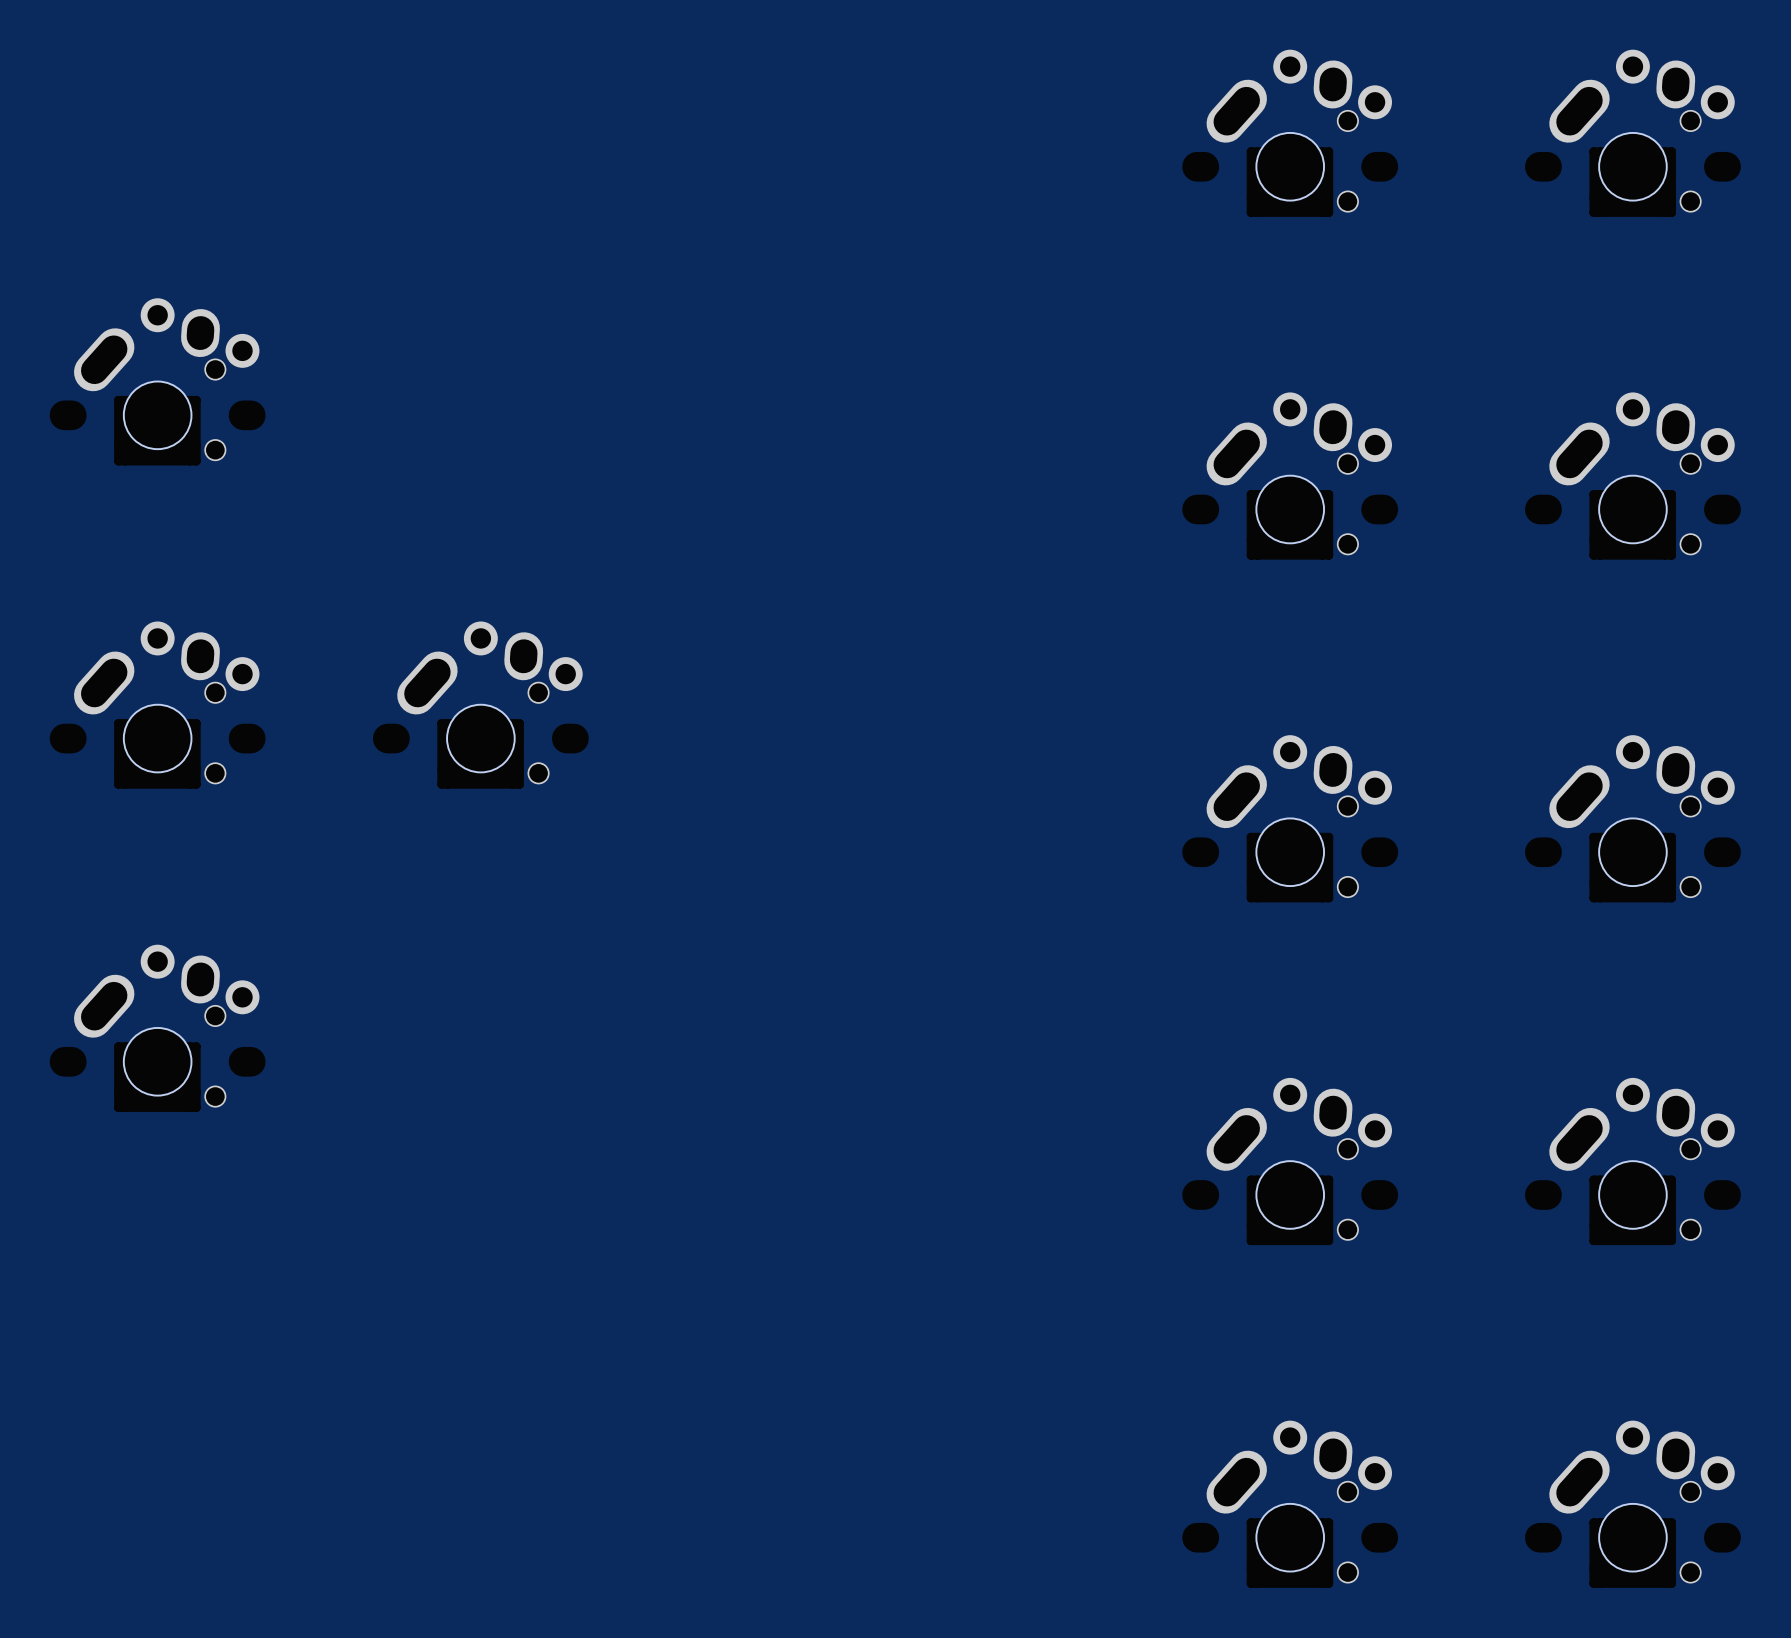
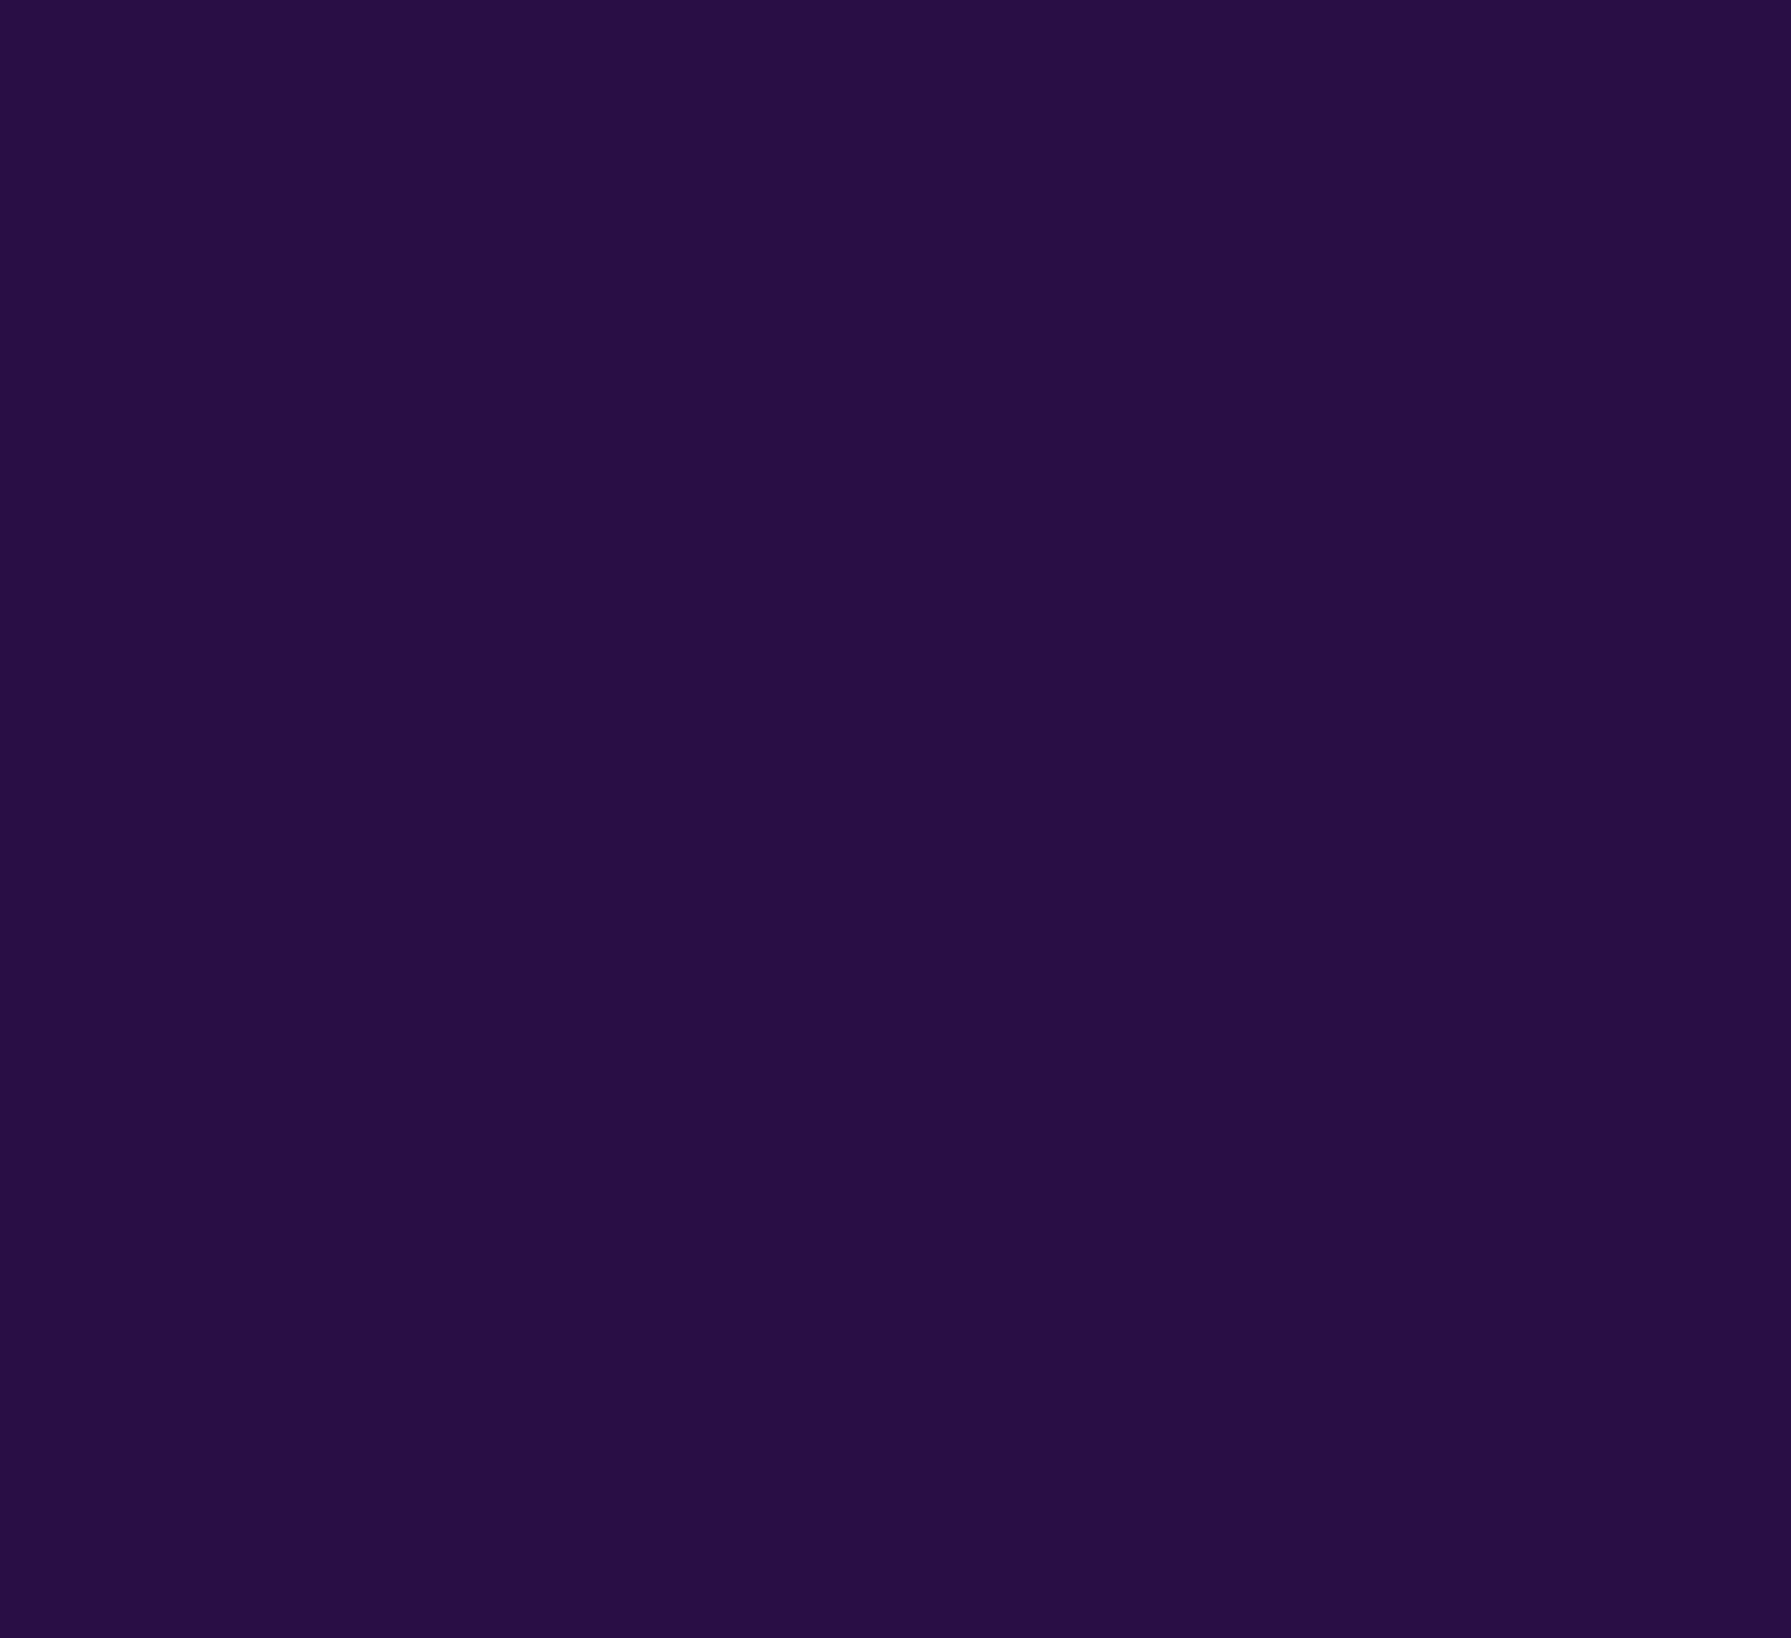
part: (1290, 133) -> none
part: (1632, 133) -> none
part: (157, 381) -> none
part: (1290, 476) -> none
part: (1632, 476) -> none
part: (157, 705) -> none
part: (480, 705) -> none
part: (1290, 818) -> none
part: (1632, 818) -> none
part: (157, 1028) -> none
part: (1290, 1161) -> none
part: (1632, 1161) -> none
part: (1290, 1504) -> none
part: (1632, 1504) -> none

